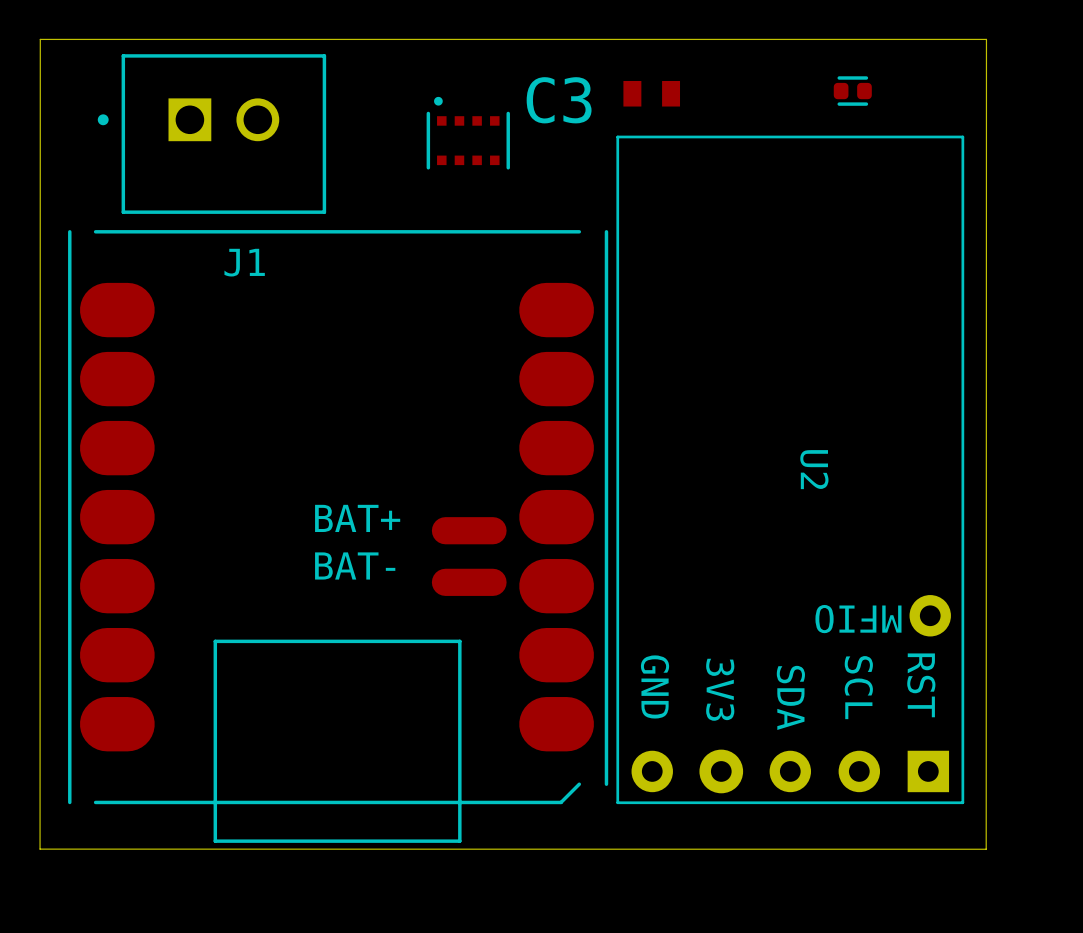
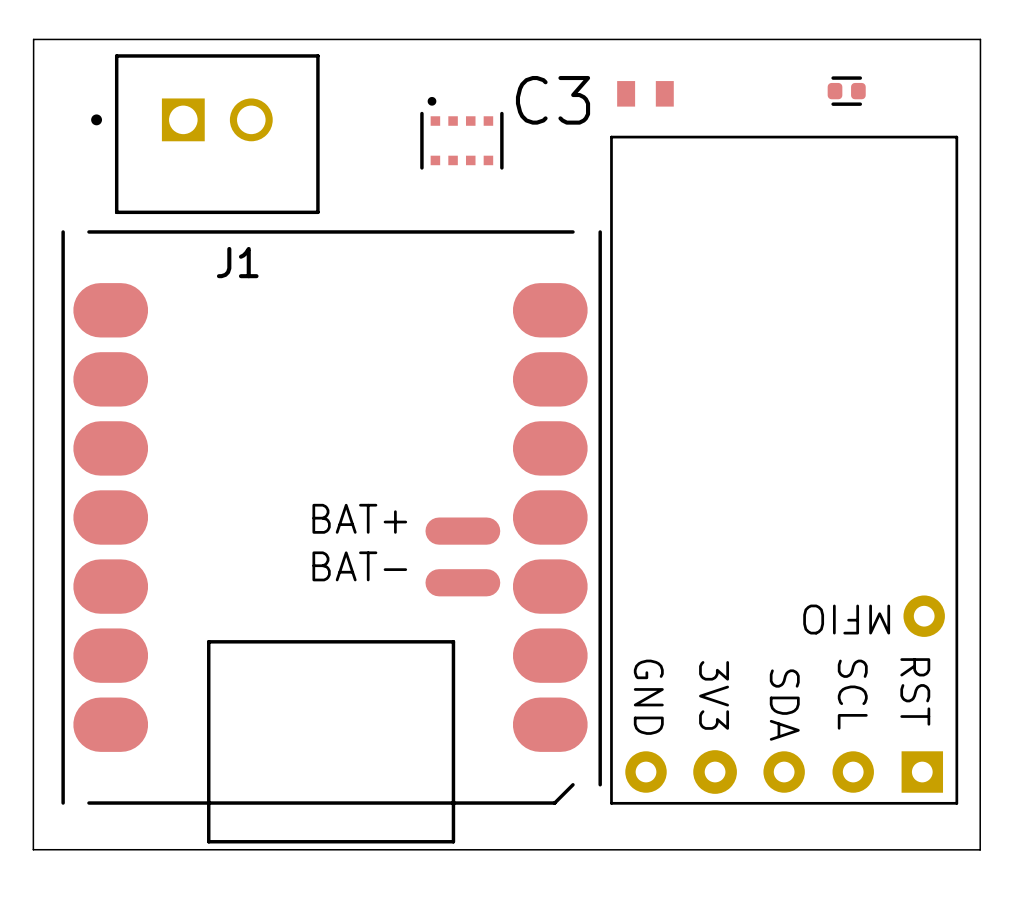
U2 name: U2 (814, 469) -> none

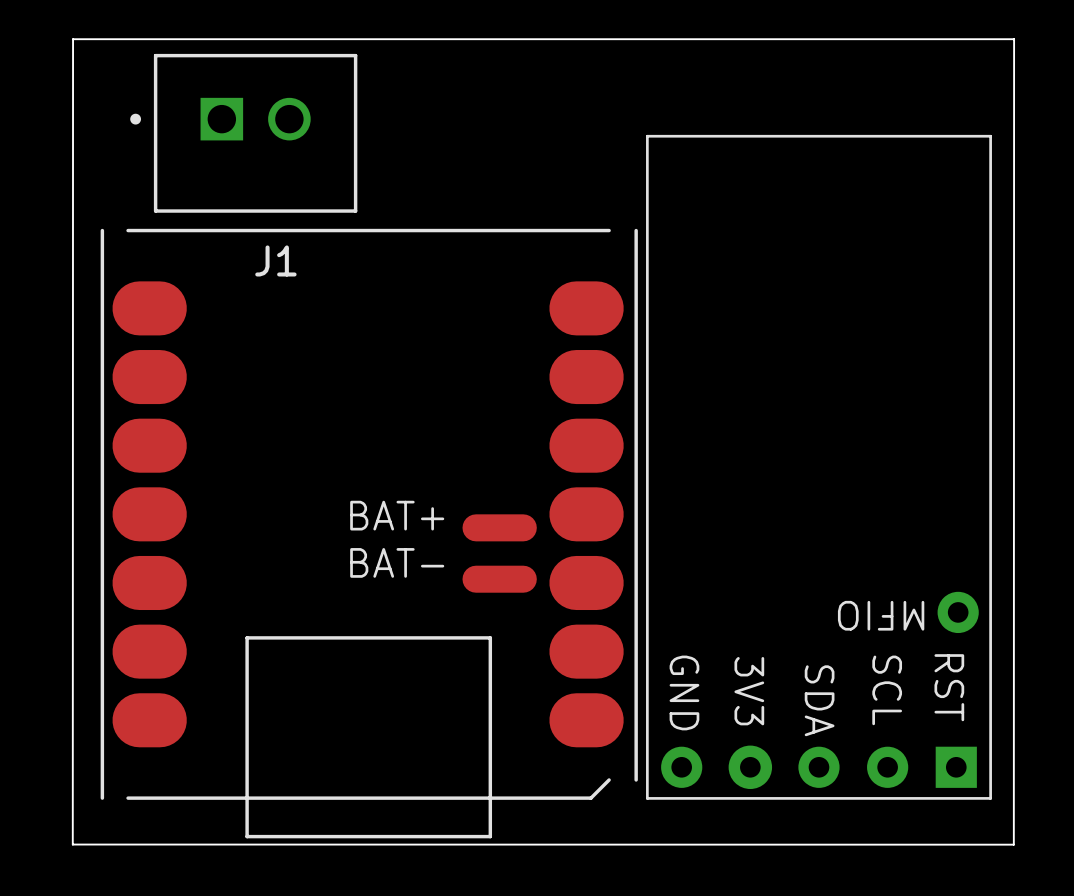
part: (846, 91) -> none
C3: (645, 93) -> none
part: (461, 133) -> none

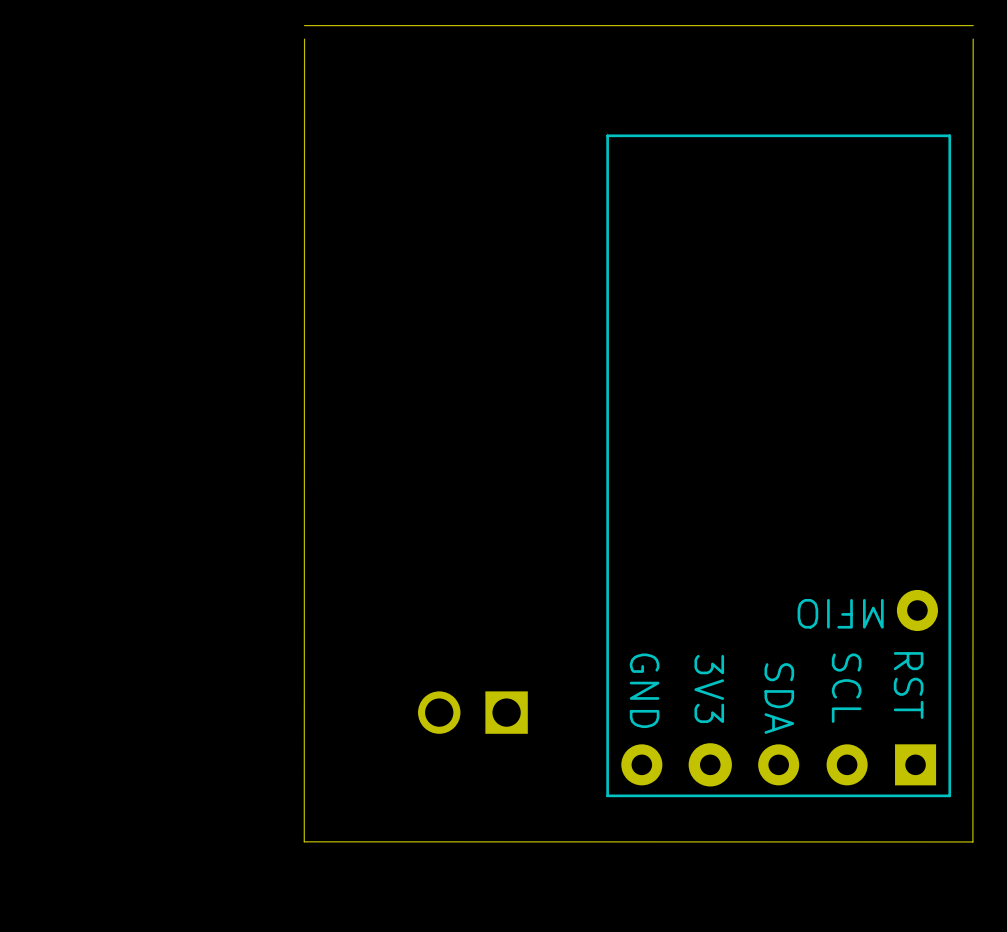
board edge: none -> (304, 25) (973, 25)
board edge: (1014, 39) (73, 39) (72, 844) (1013, 844) -> (304, 39) (304, 841) (972, 841)
J1 side: top (243, 133) -> bottom (472, 712)
part: (369, 533) -> none

